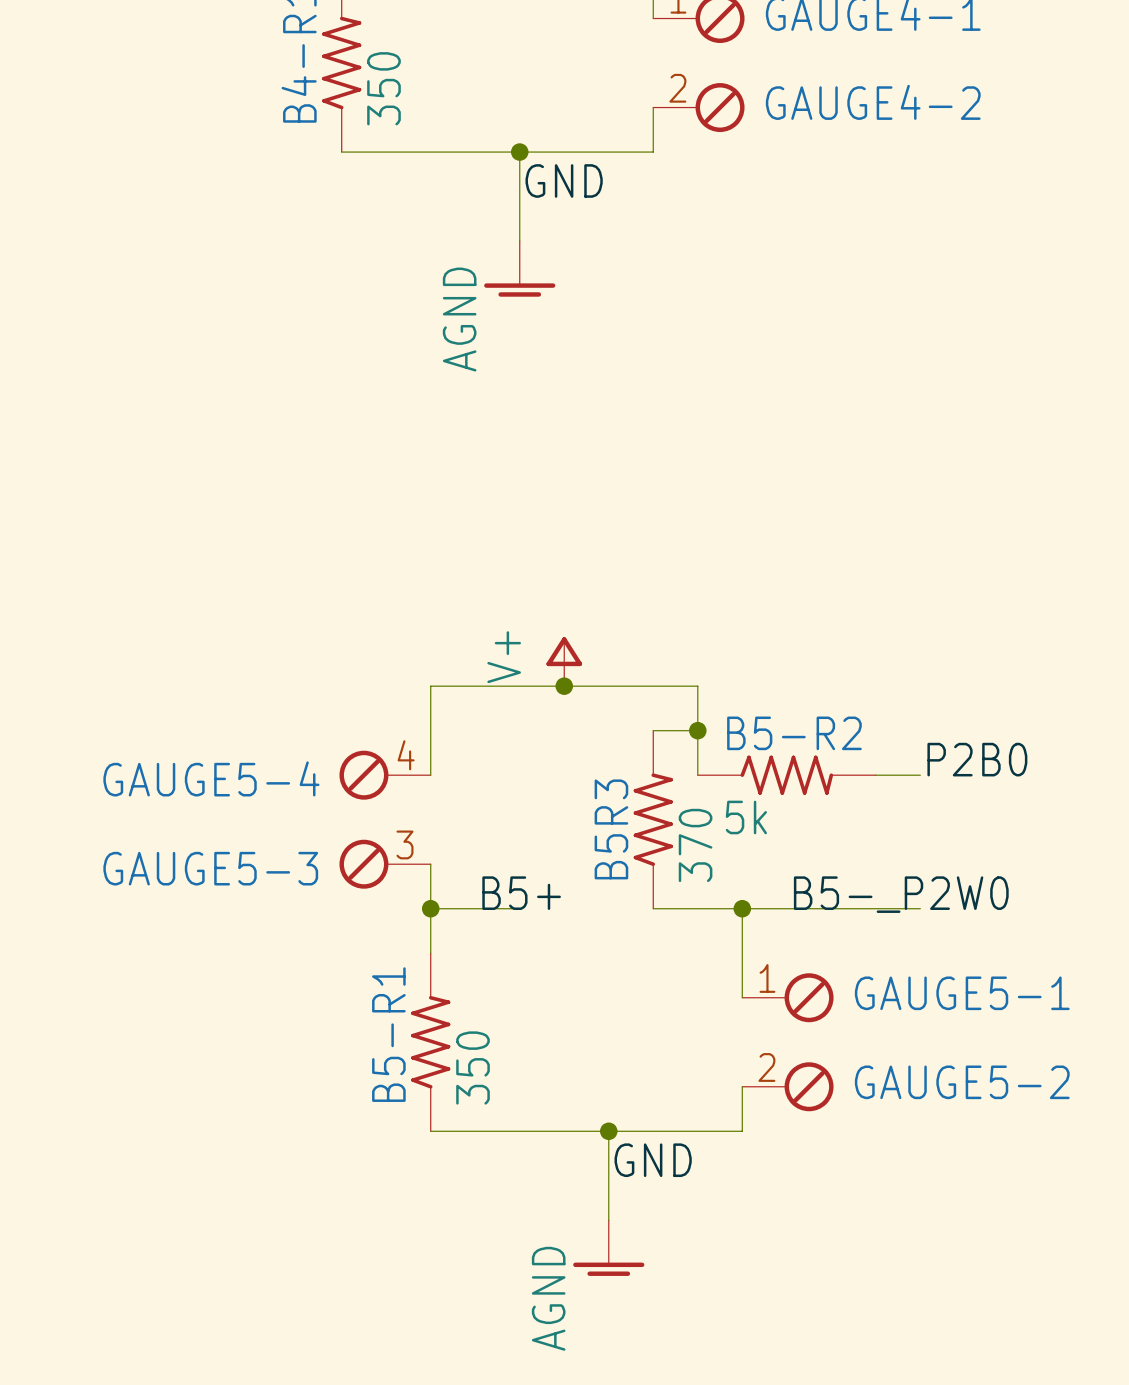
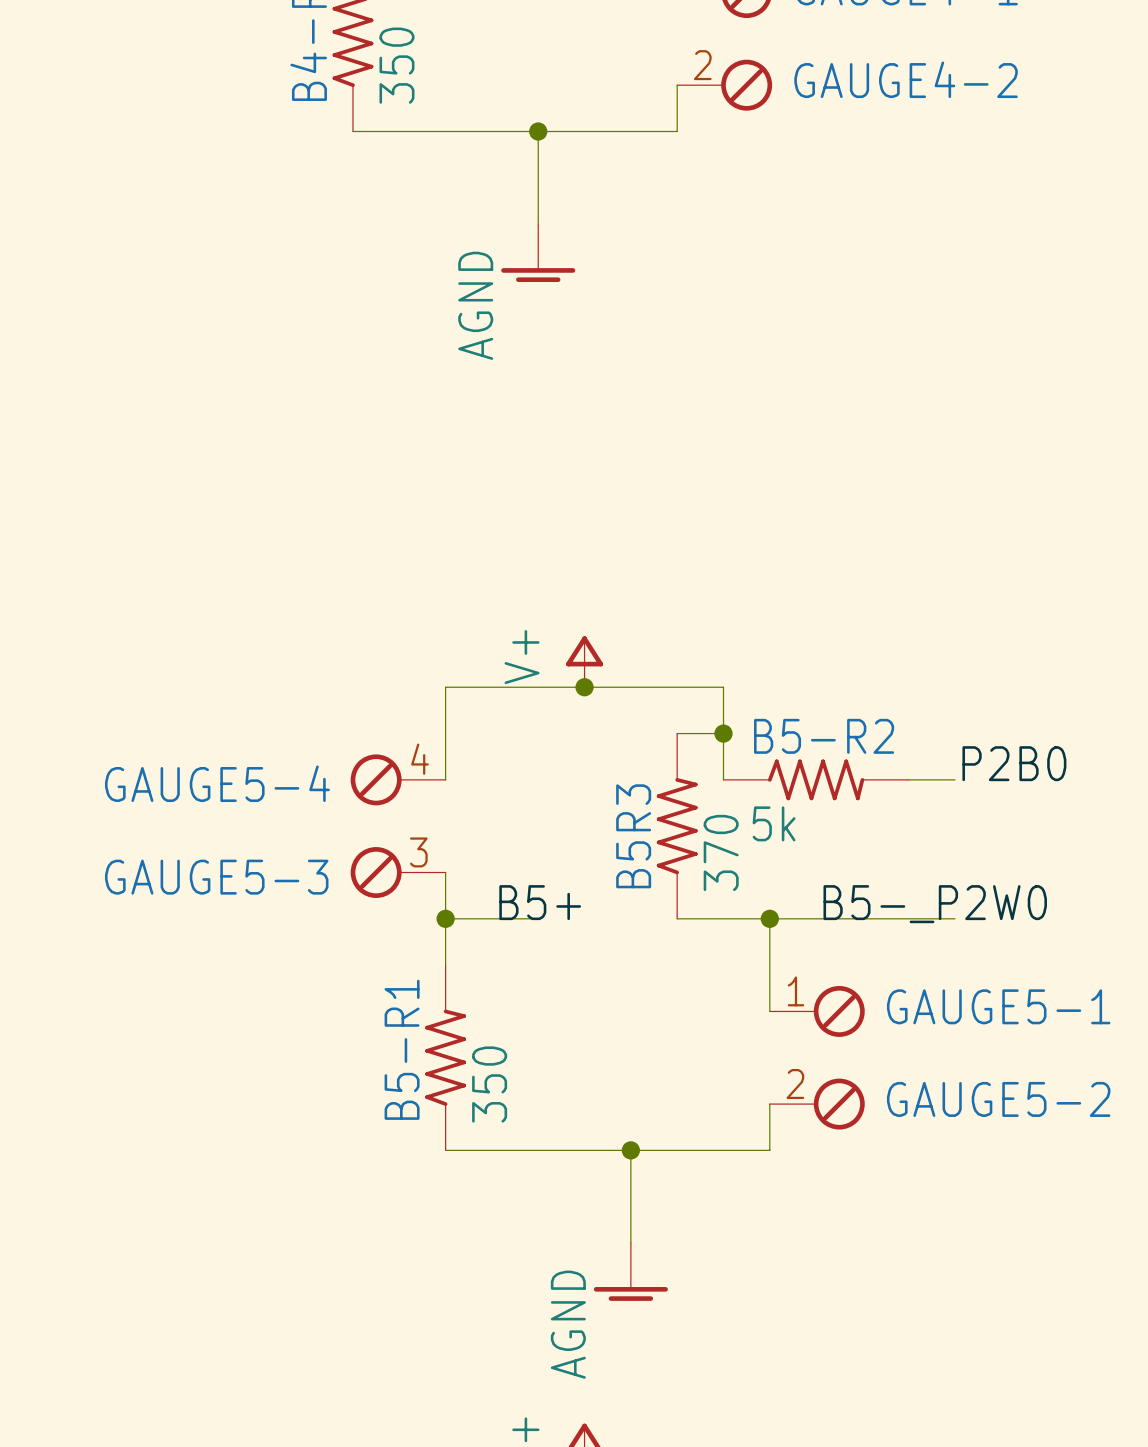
label: GND (564, 180) -> none
label: GND (653, 1160) -> none

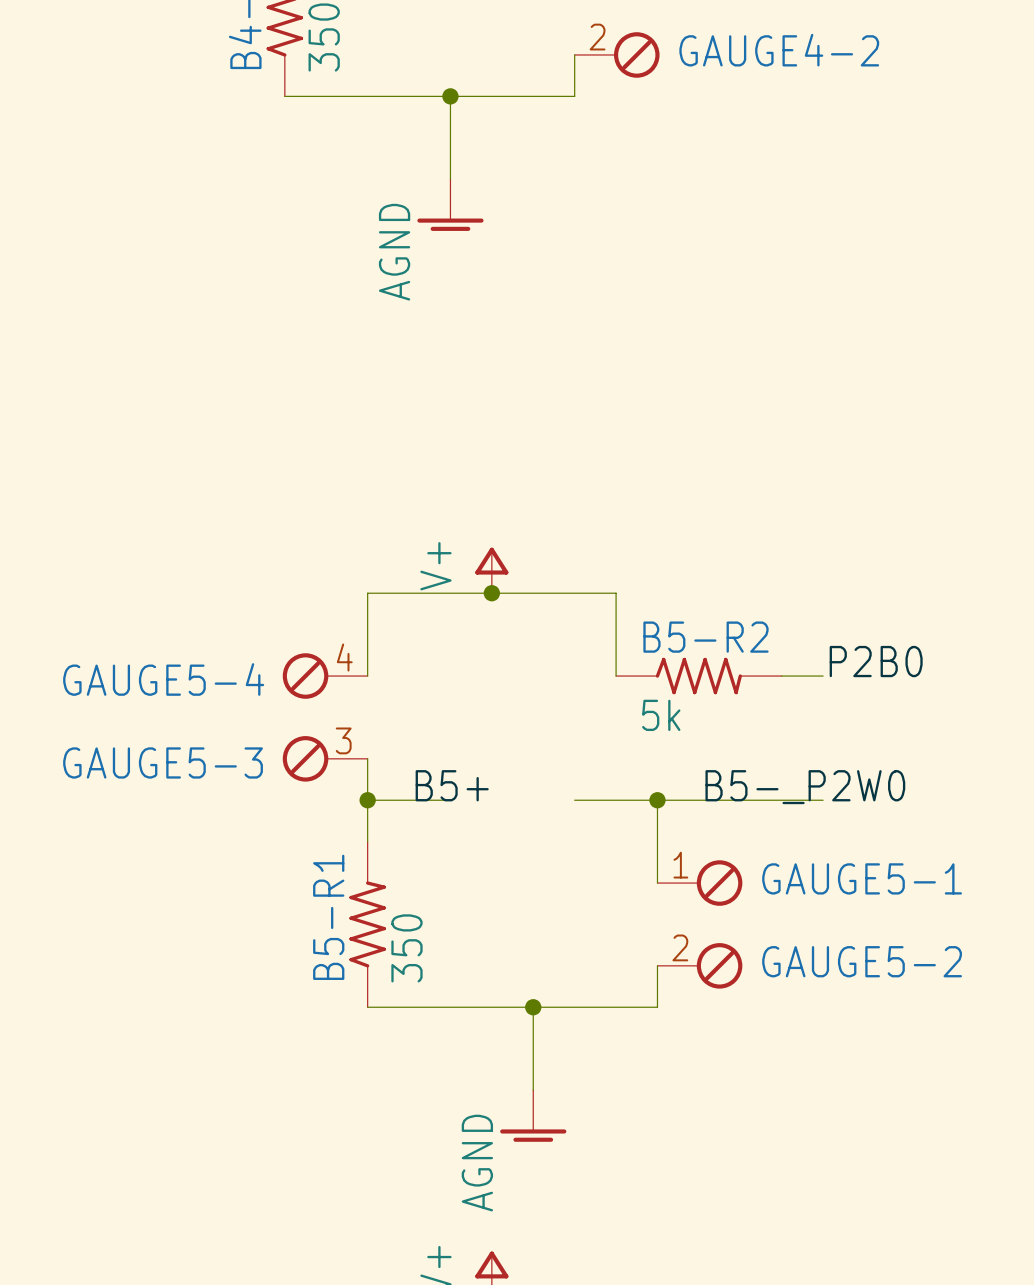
wire: (677, 733) (723, 733) -> none
junction: (723, 733) -> none
B5R3: 370 (677, 826) -> none

